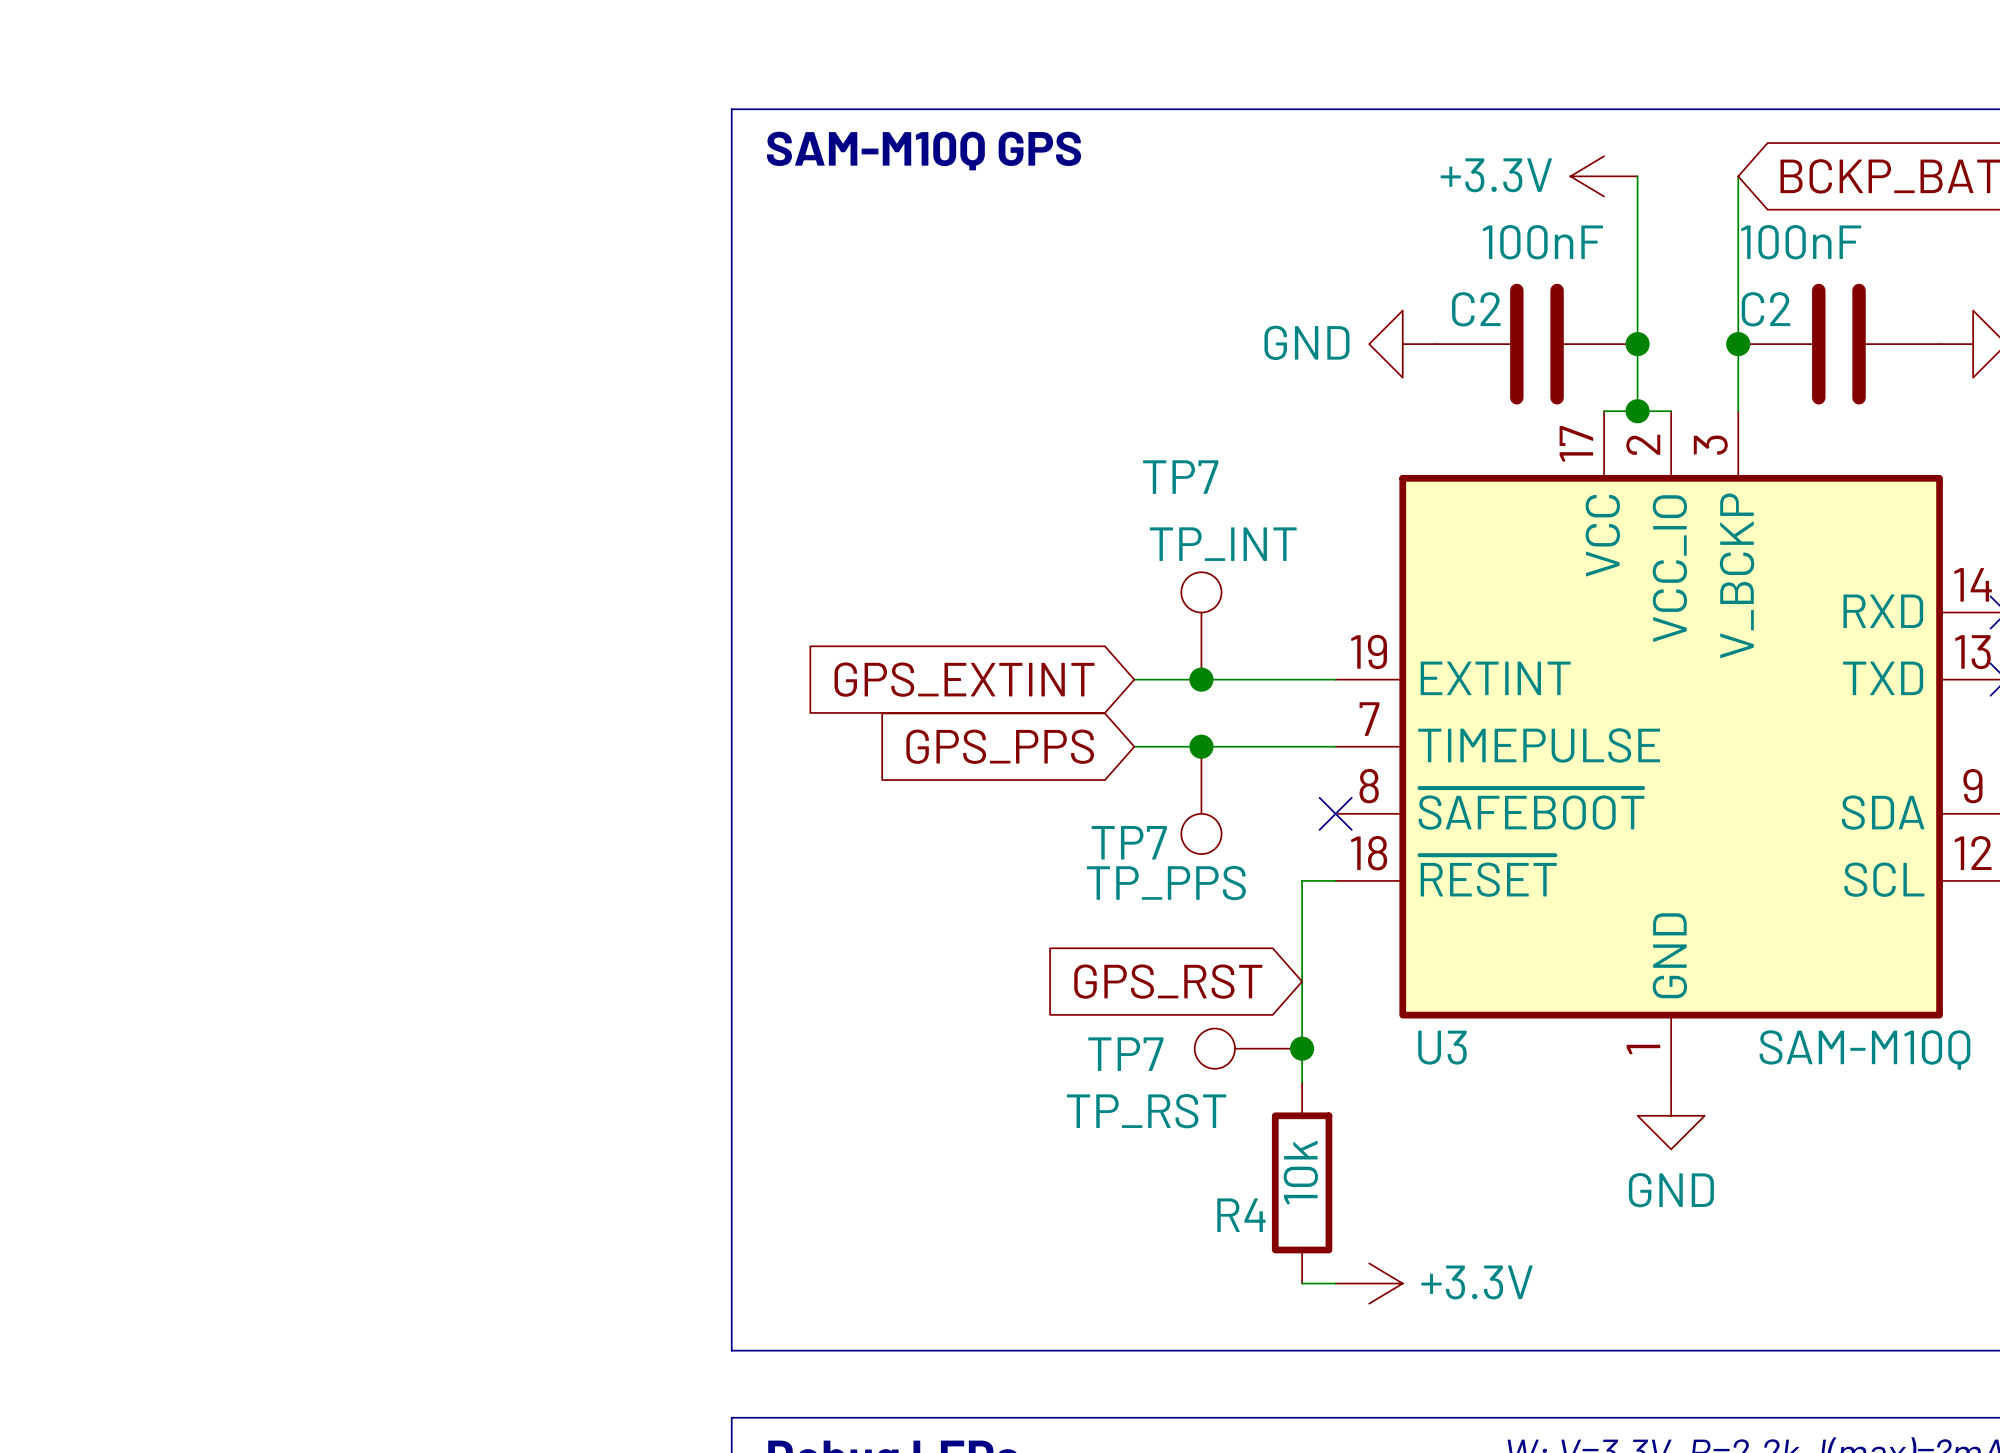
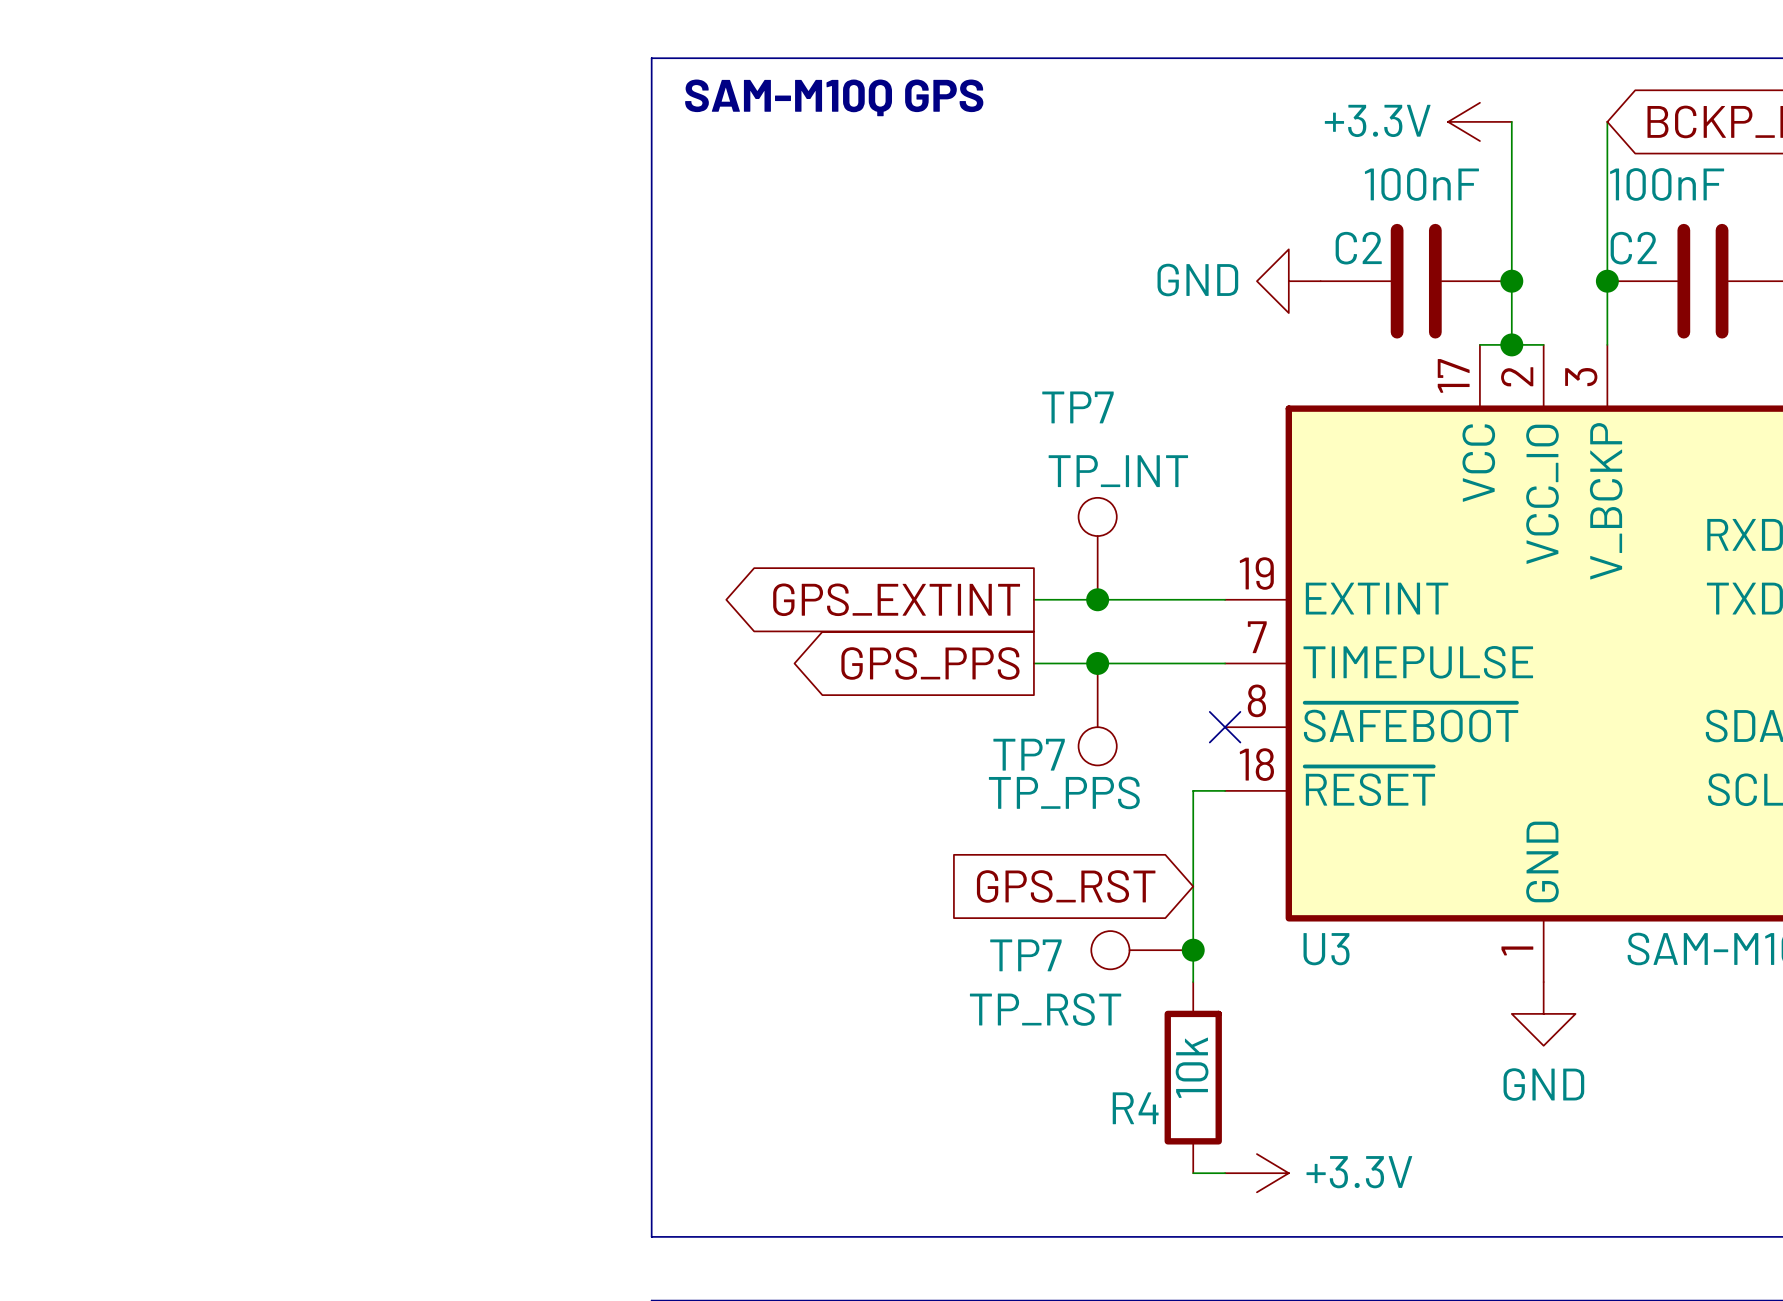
global label shape: input (964, 679) -> output (896, 599)
global label shape: input (1000, 746) -> output (930, 663)

